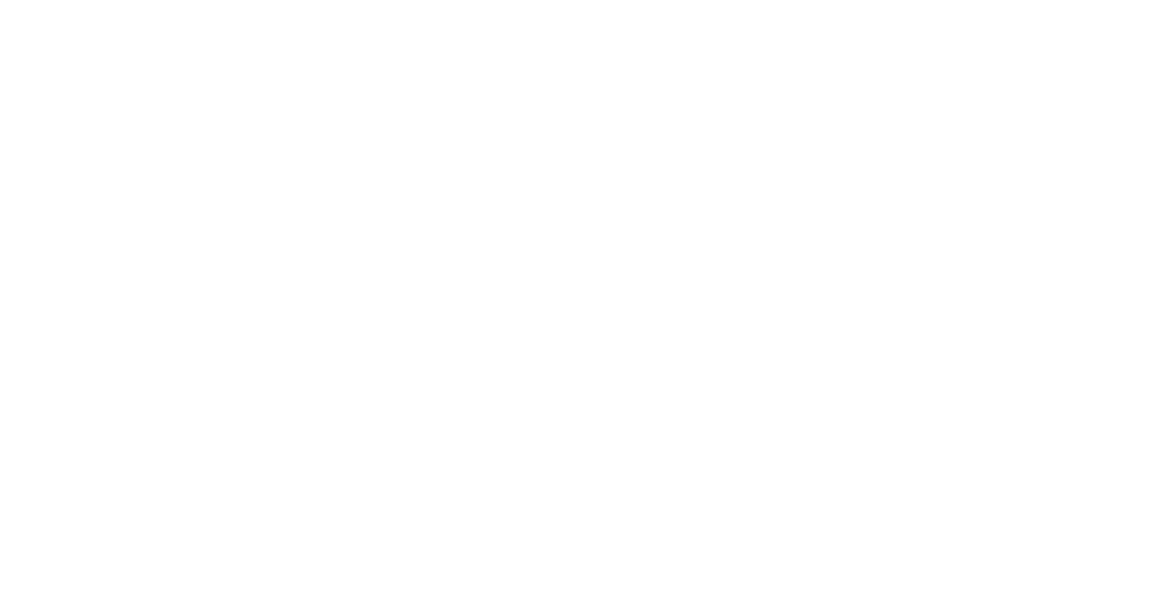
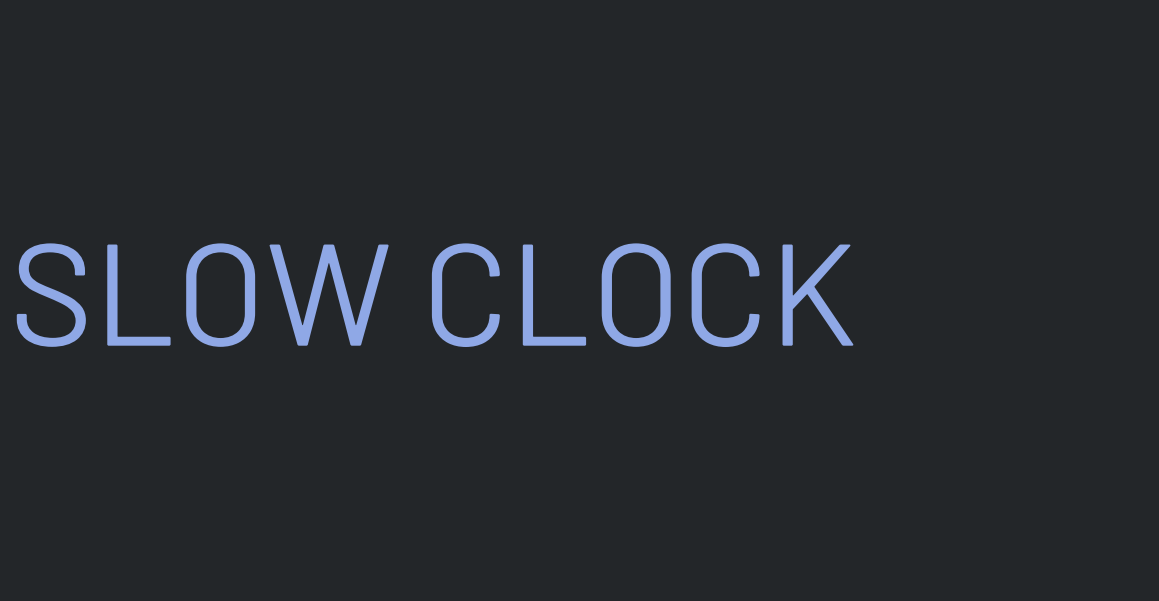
text: none -> SLOW CLOCK (435, 295)

